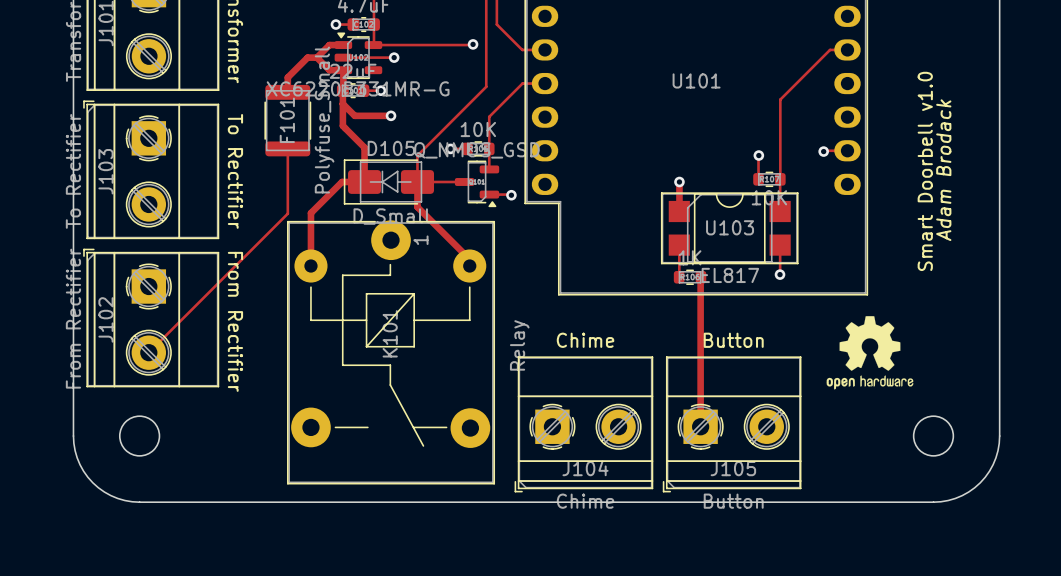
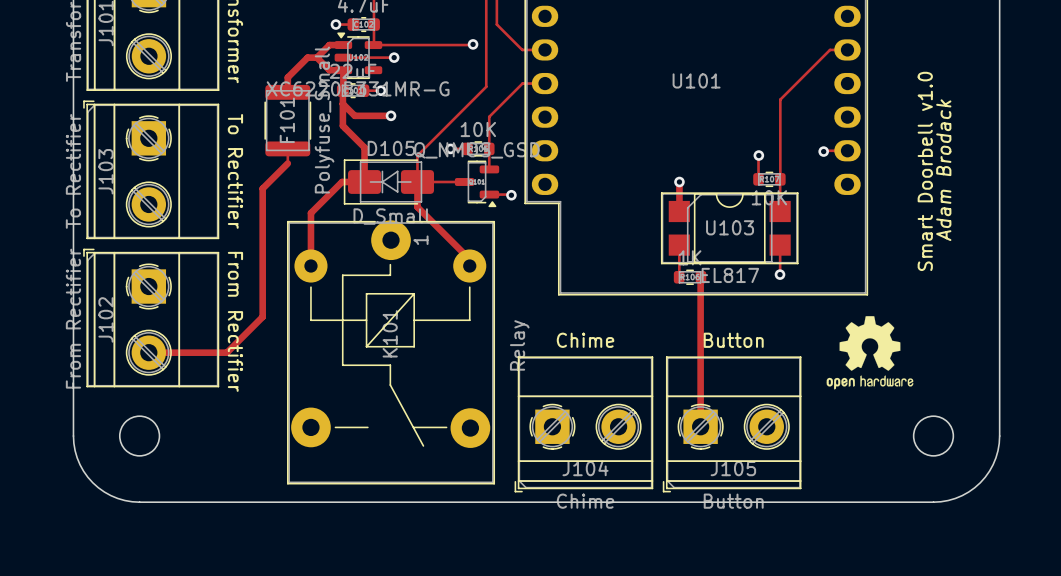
track: (287, 163) (287, 213) (148, 352) -> (287, 163) (262, 188) (262, 316) (226, 352) (148, 352)

